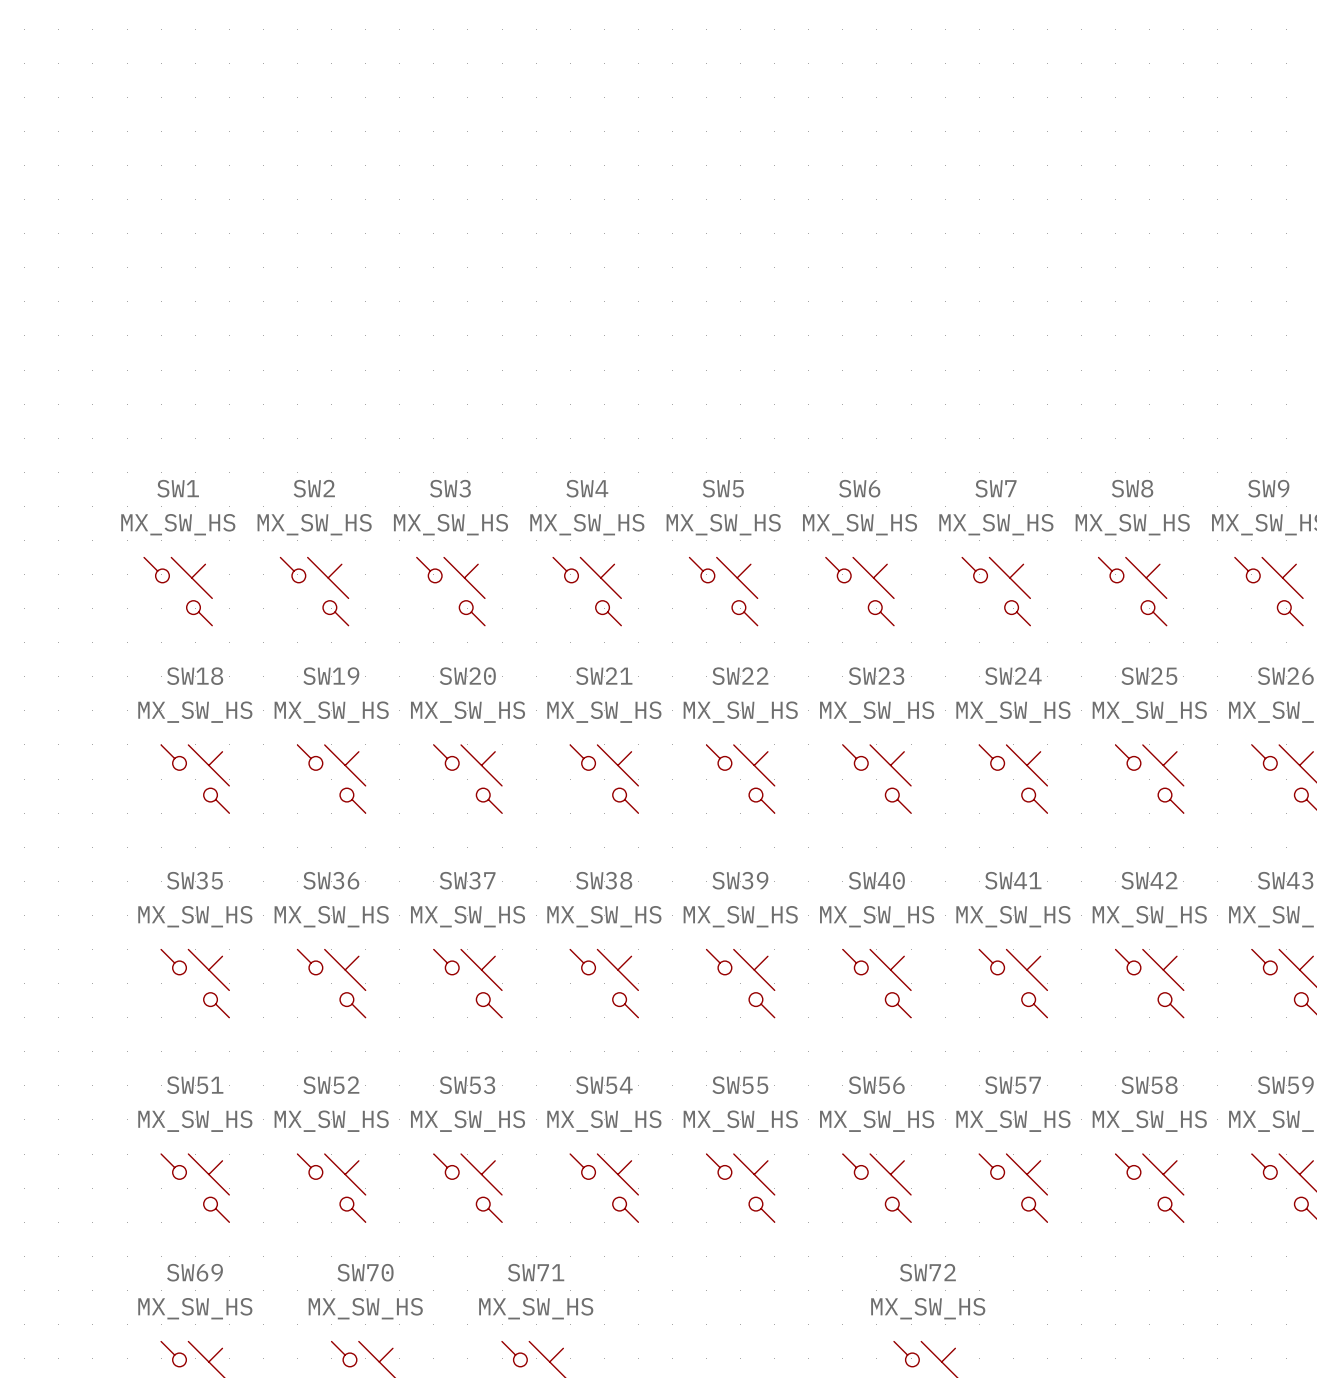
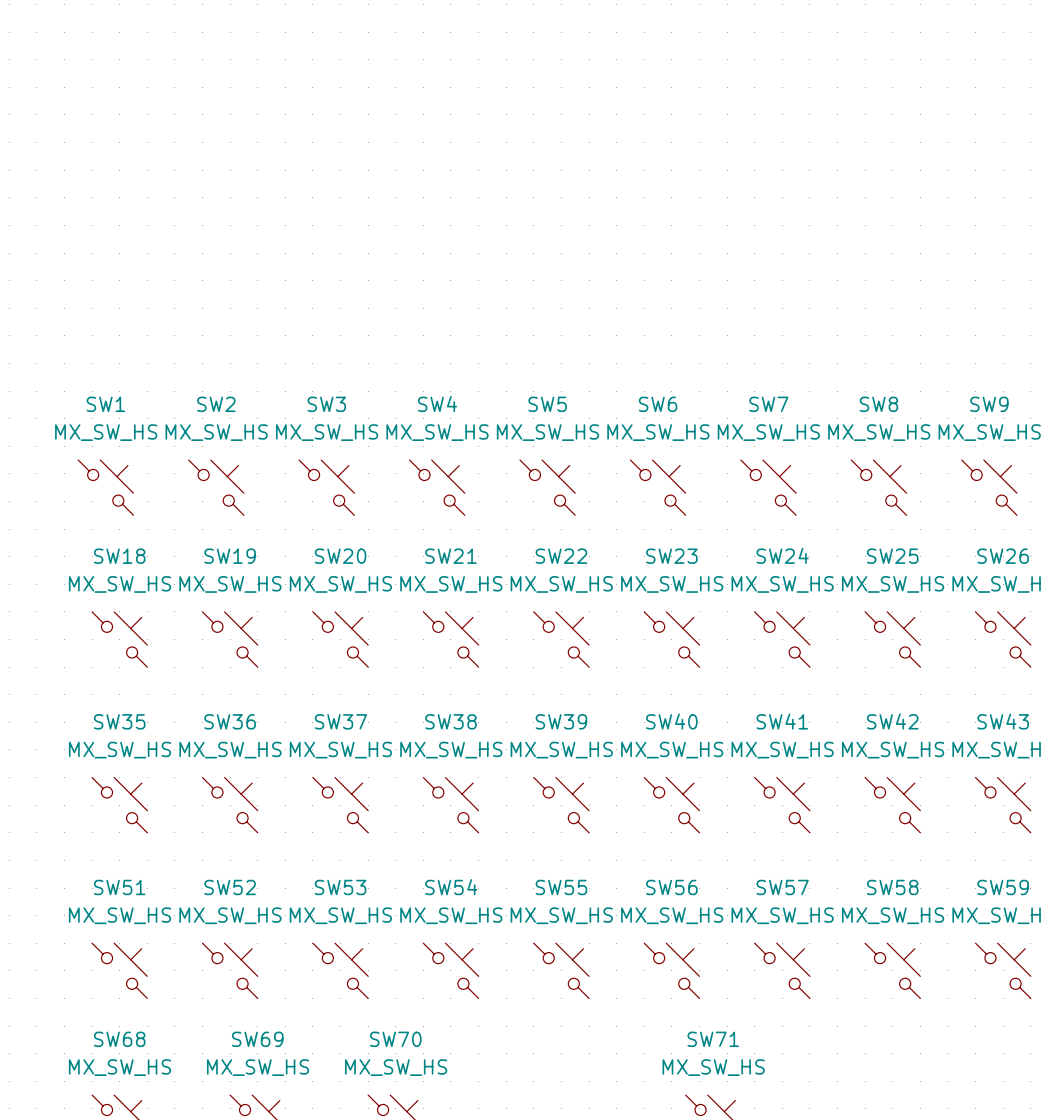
SW69 name: SW69 (194, 1272) -> SW68 (119, 1039)
SW70 name: SW70 (365, 1272) -> SW69 (257, 1039)
SW71 name: SW71 (536, 1272) -> SW70 (395, 1039)
SW72 name: SW72 (927, 1272) -> SW71 (713, 1039)

